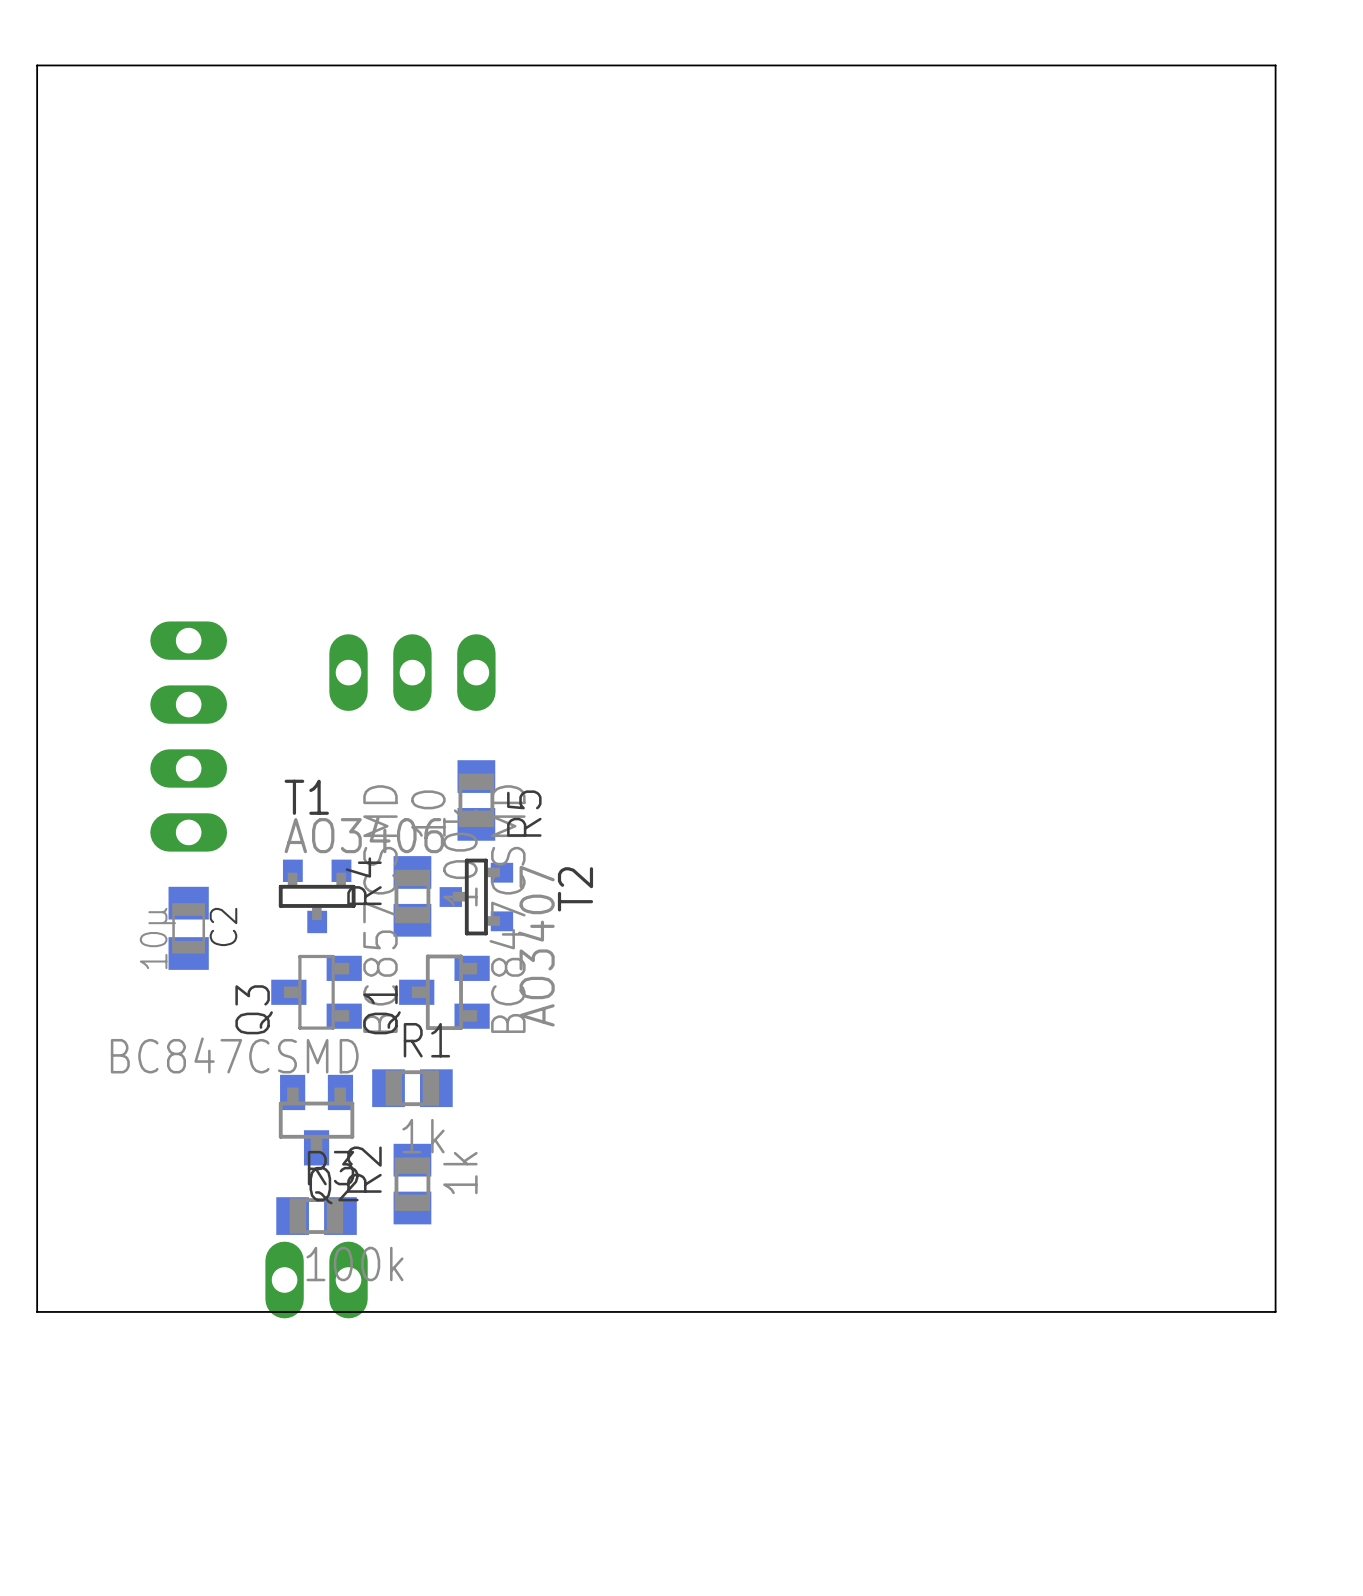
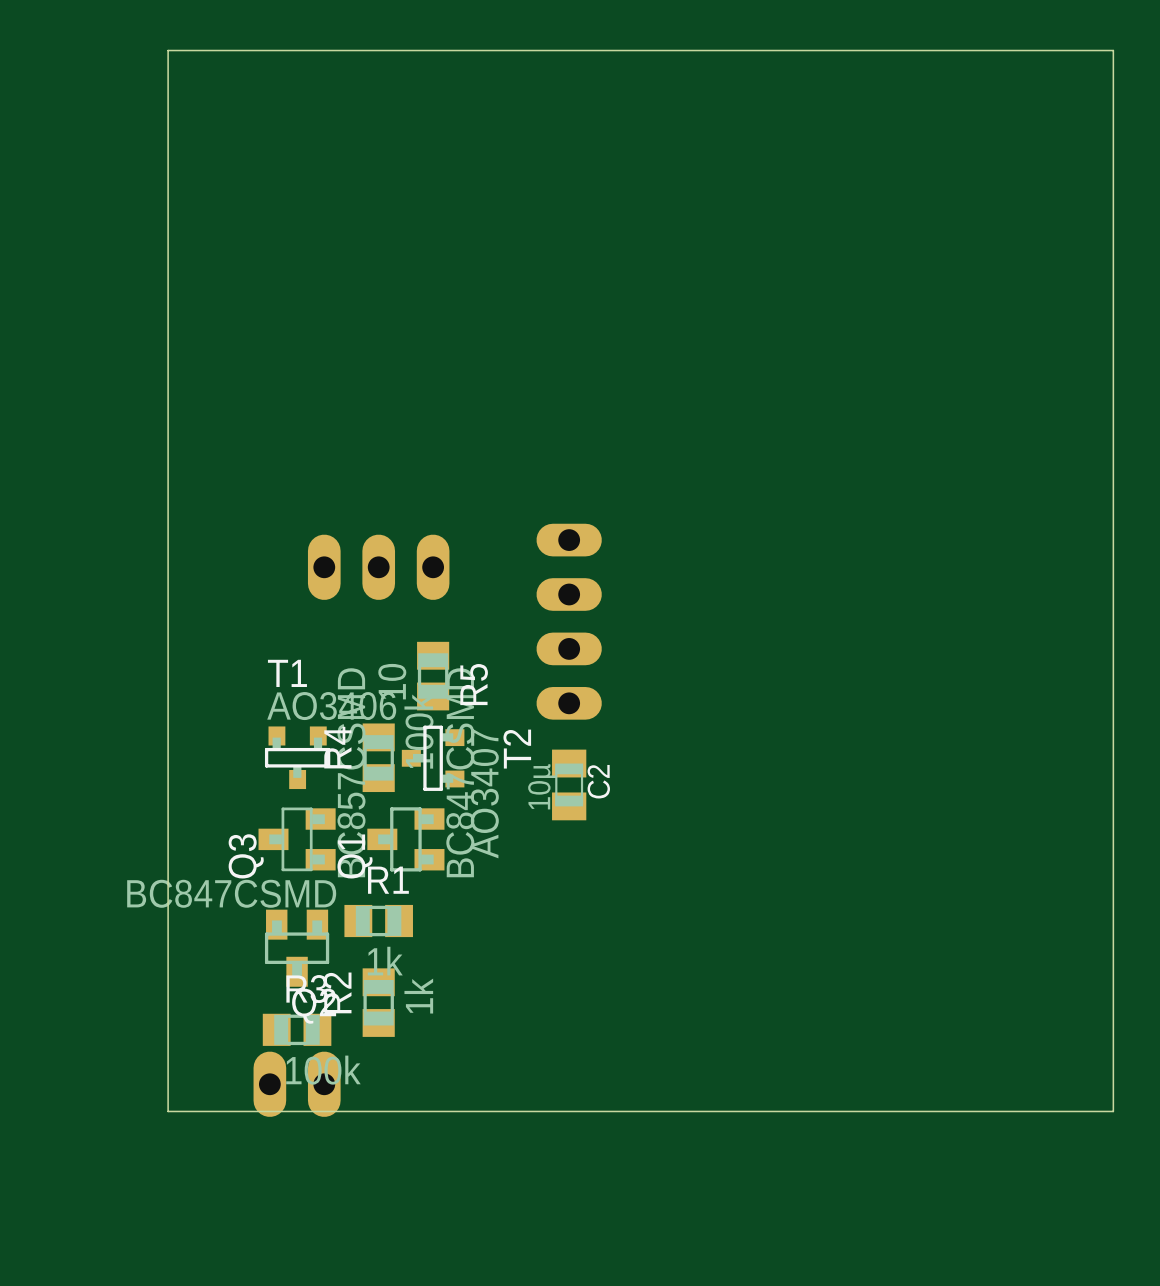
board edge: (165, 65) (37, 65) (37, 1311) (165, 1311) -> (168, 50) (168, 1111)
part position: (188, 736) -> (569, 621)
C2 position: (188, 928) -> (569, 784)

